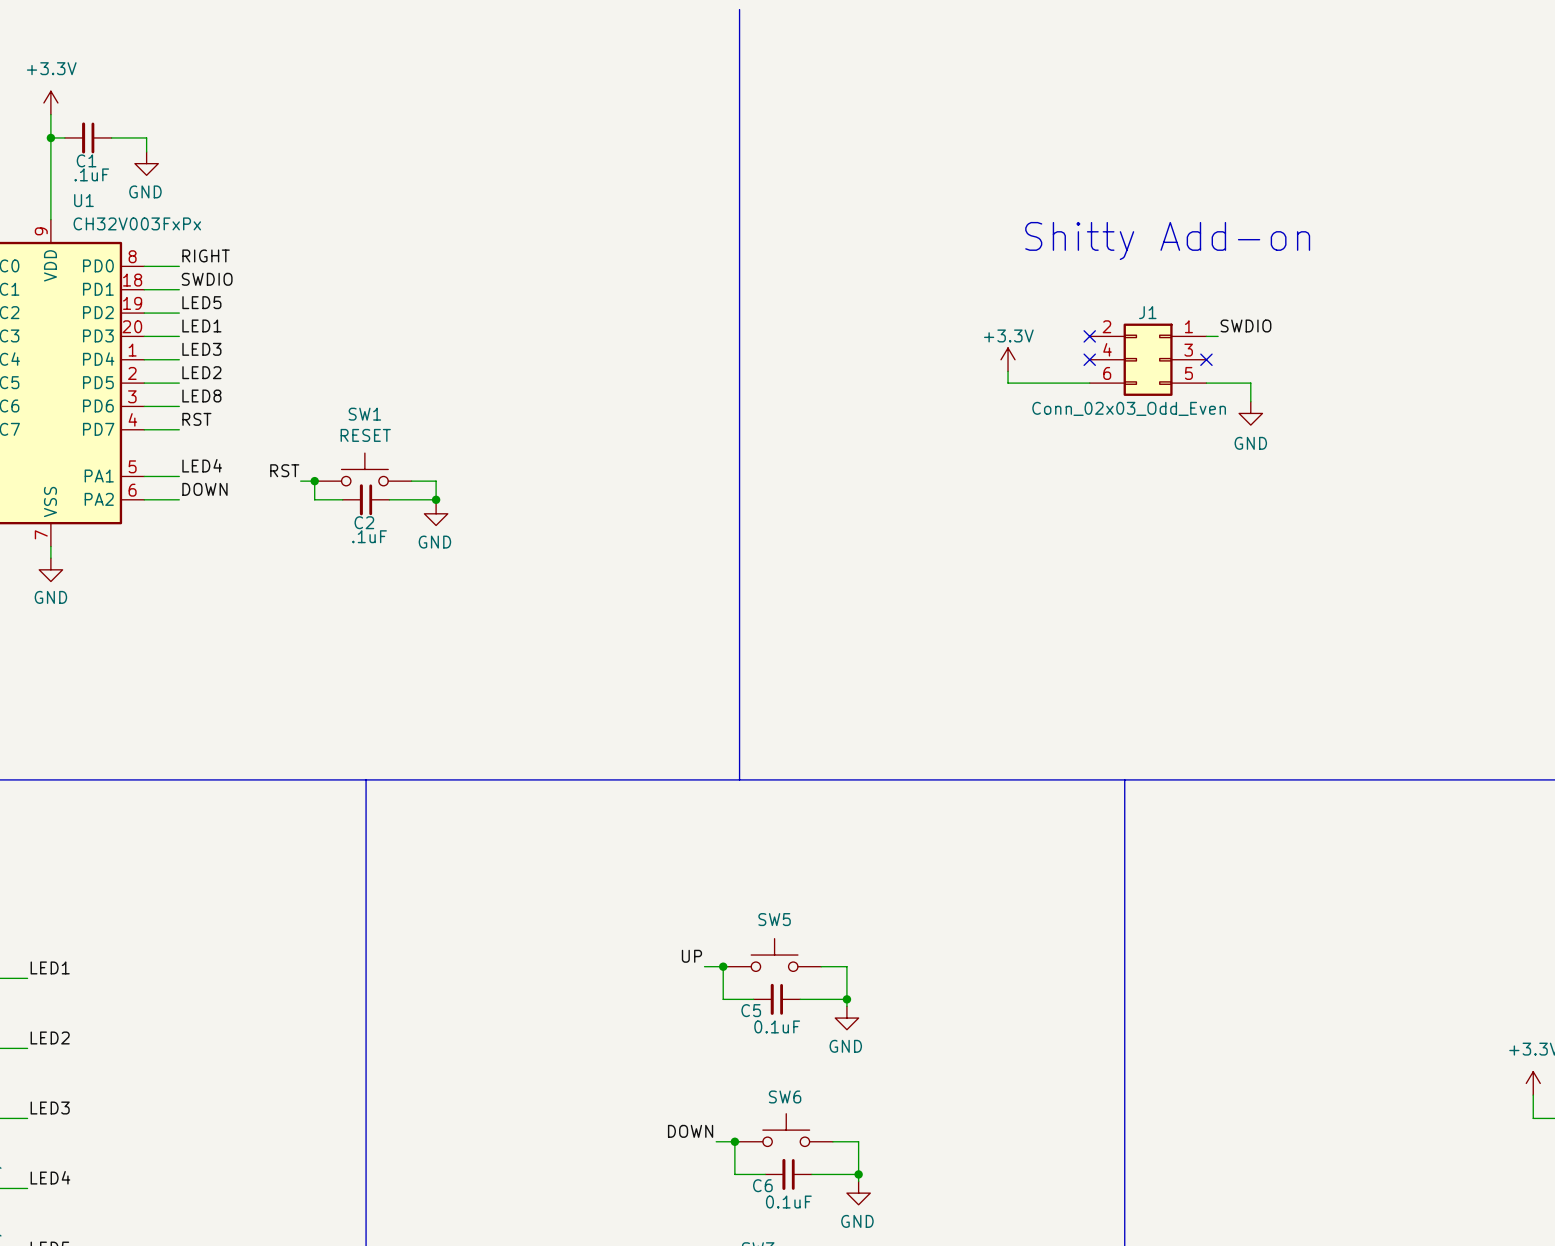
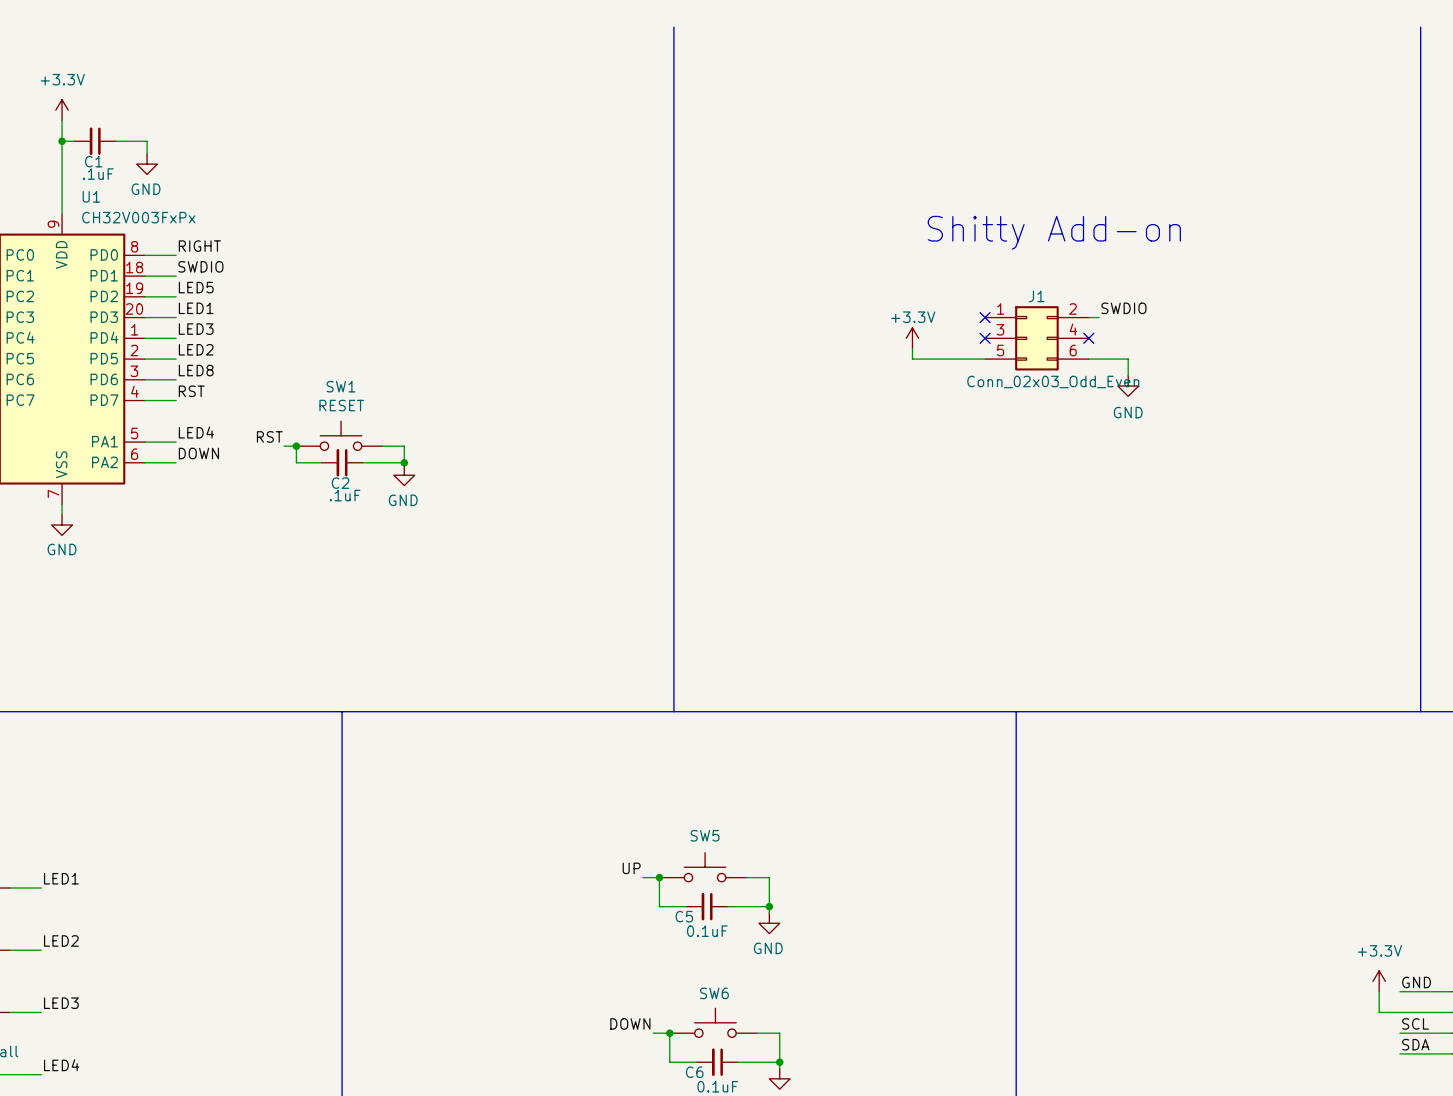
J1 flip: as is (1148, 359) -> left-right (1036, 338)

